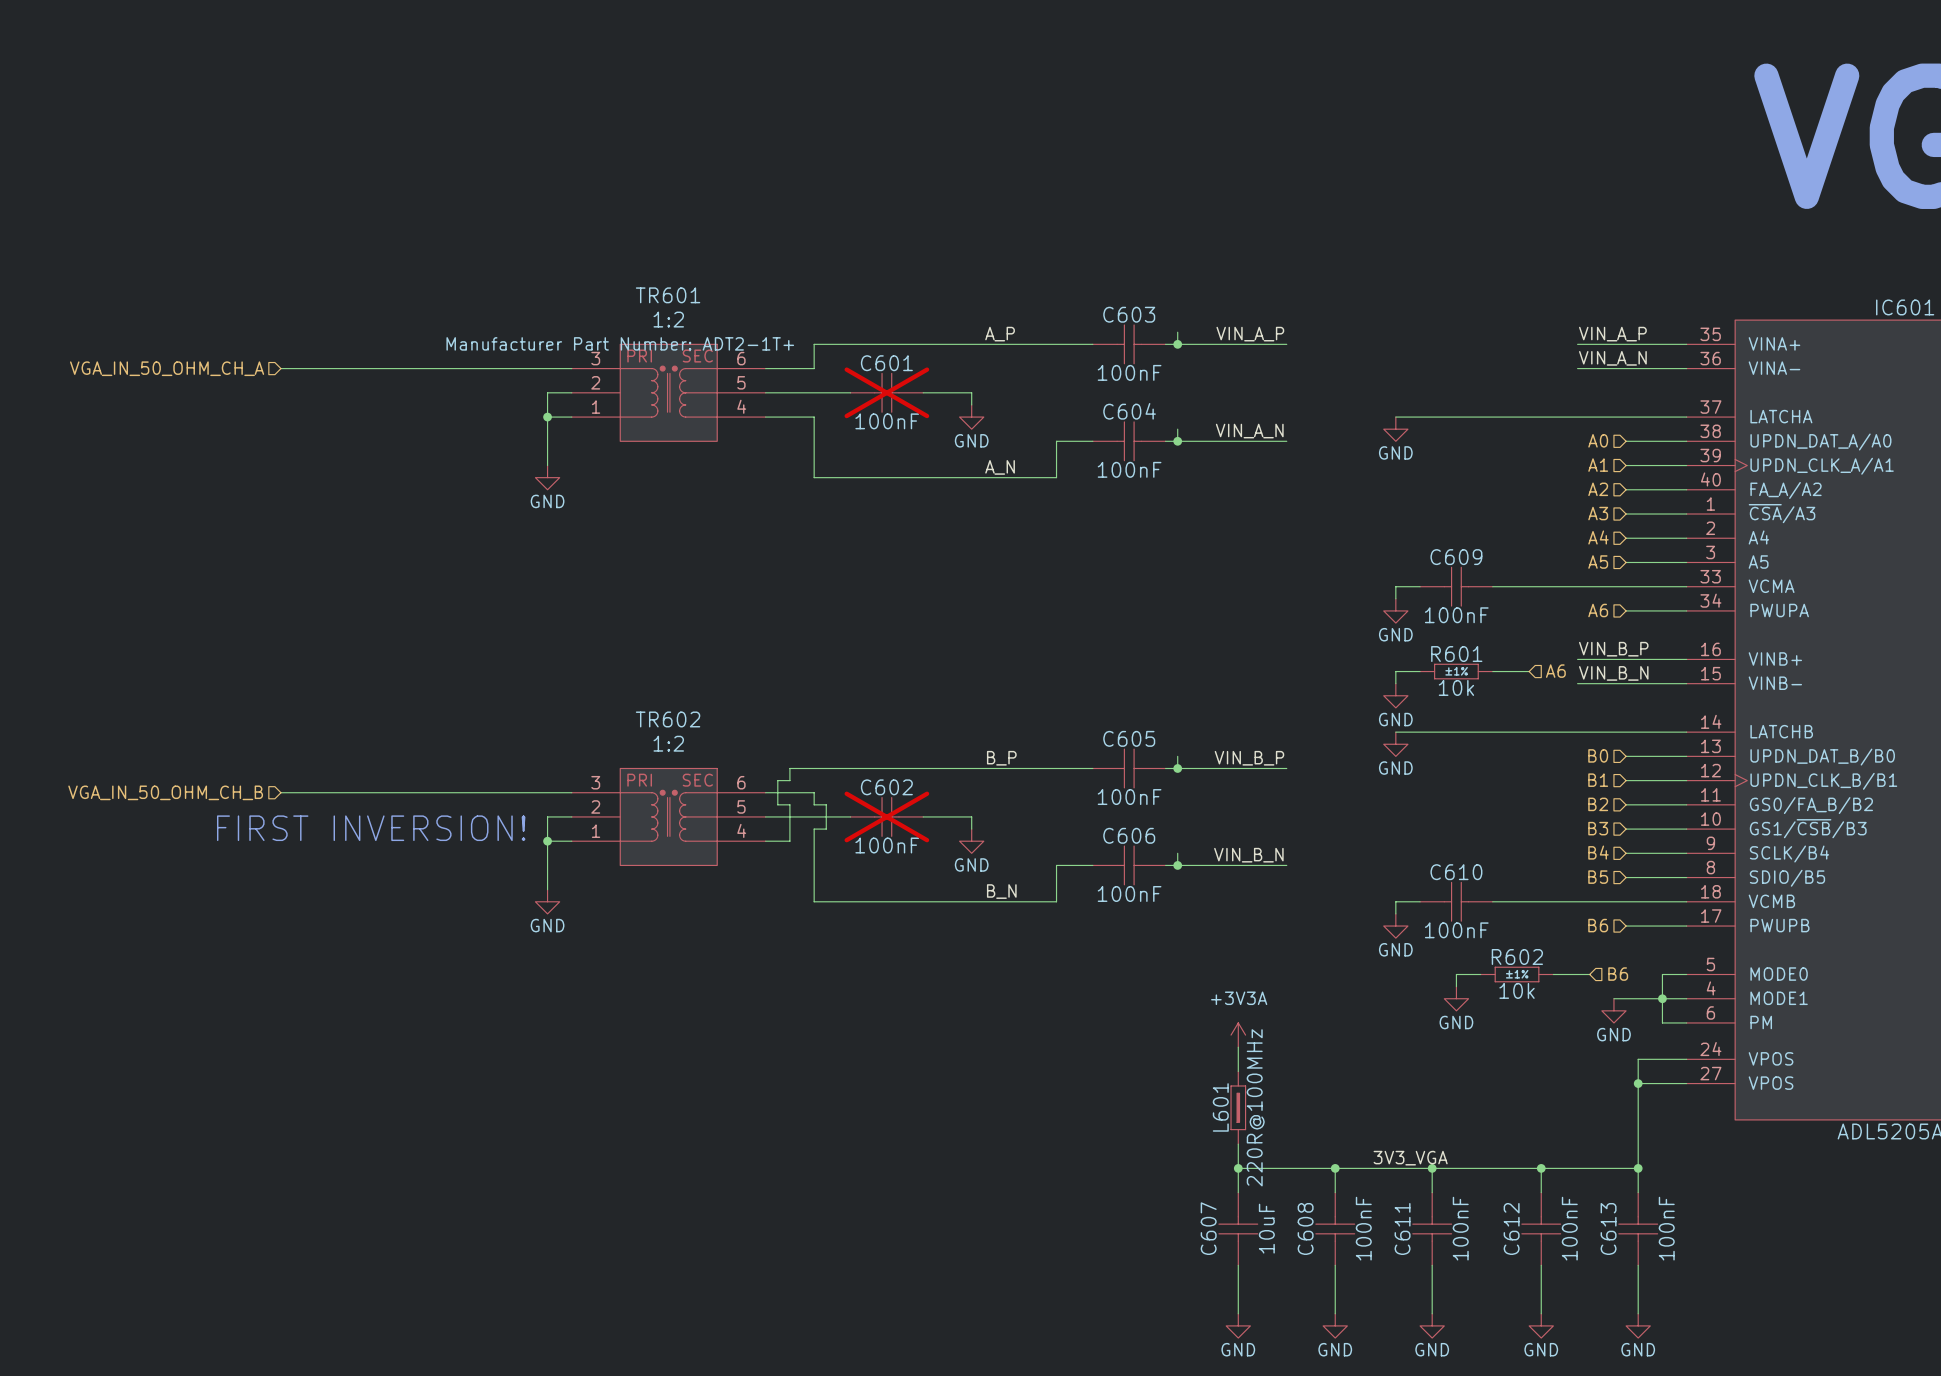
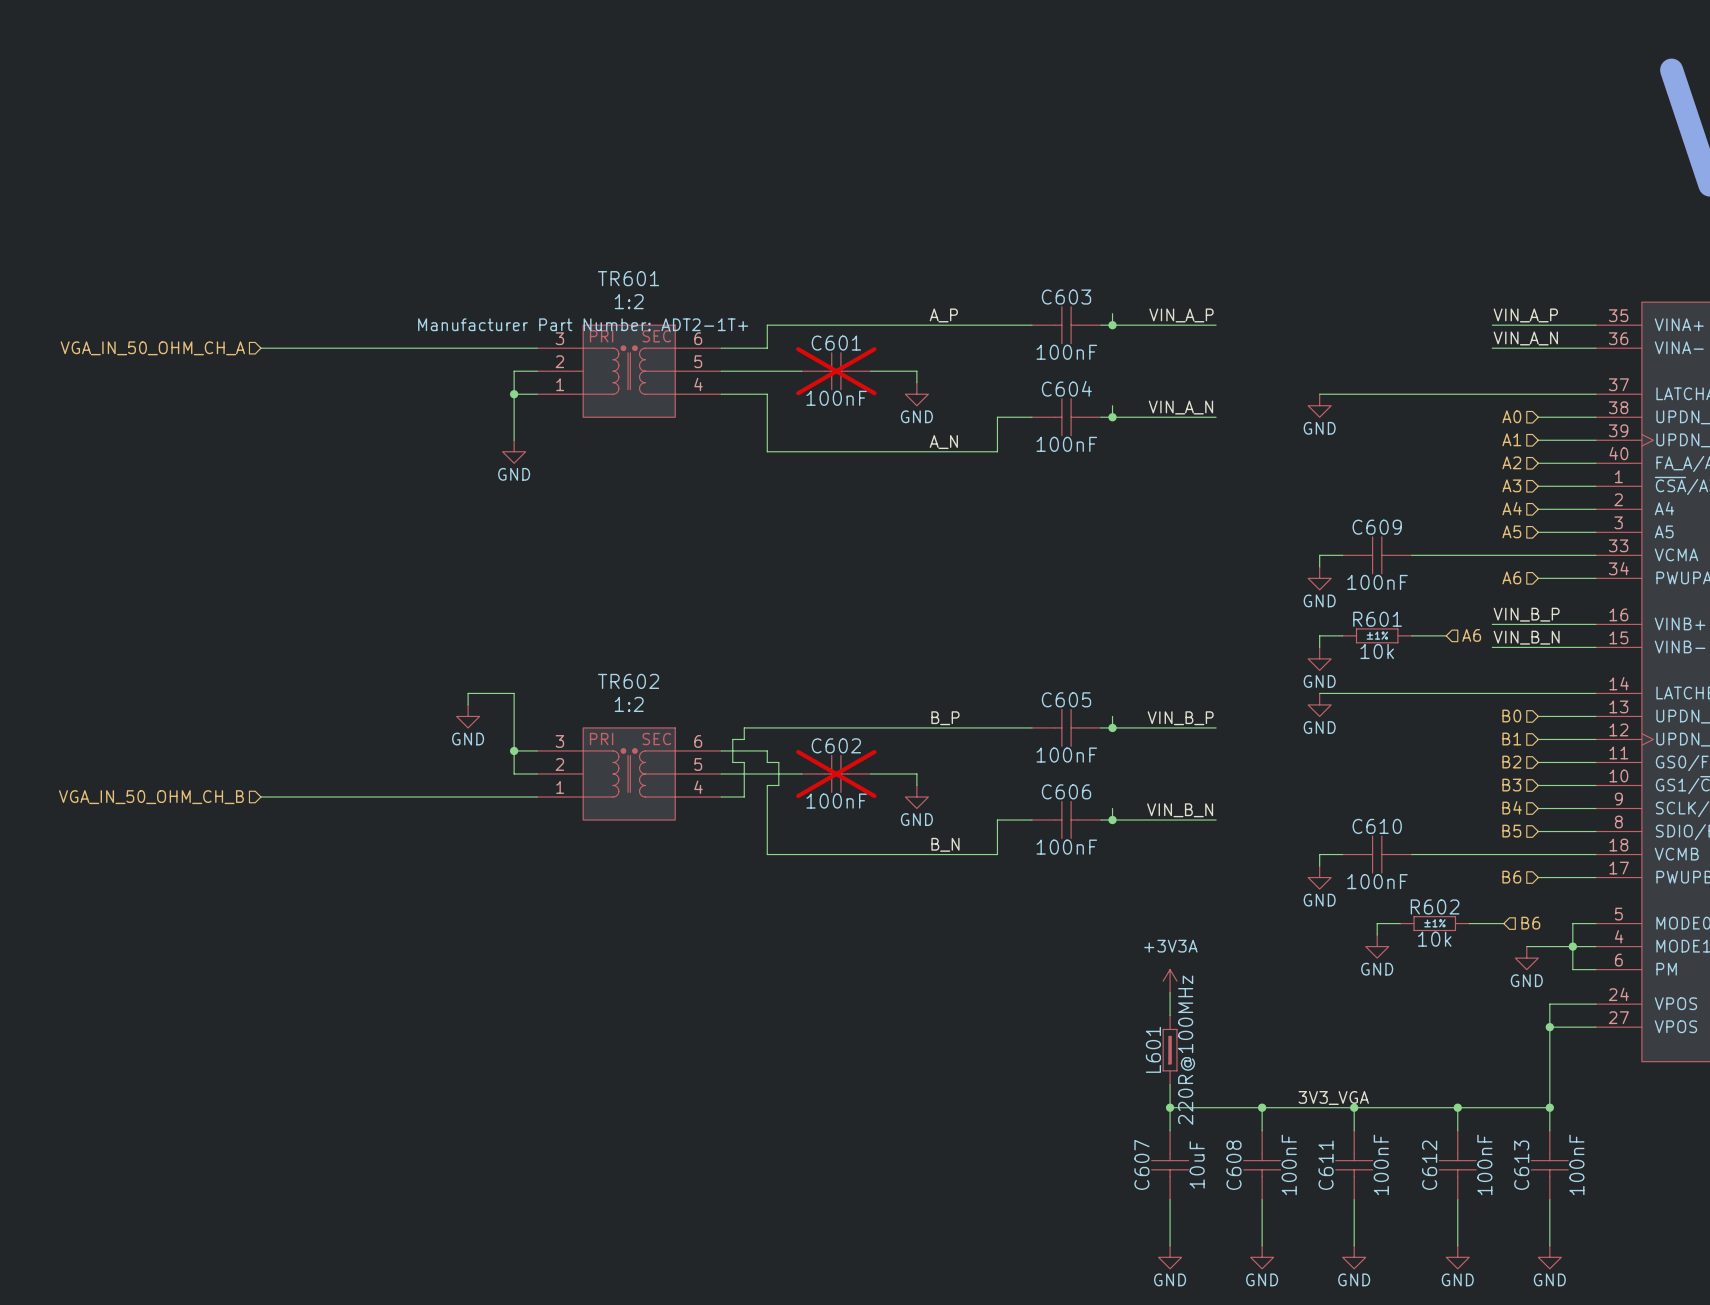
hierarchical label position: VGA_IN_50_OHM_CH_B (165, 792) -> VGA_IN_50_OHM_CH_B (151, 797)
wire: (280, 792) (547, 792) -> (260, 797) (514, 797)
wire: (547, 816) (547, 889) -> (514, 773) (514, 693) (468, 693) (468, 704)
text: FIRST INVERSION! (371, 828) -> none
junction position: (547, 841) -> (514, 750)
power symbol position: GND (547, 901) -> GND (468, 716)

